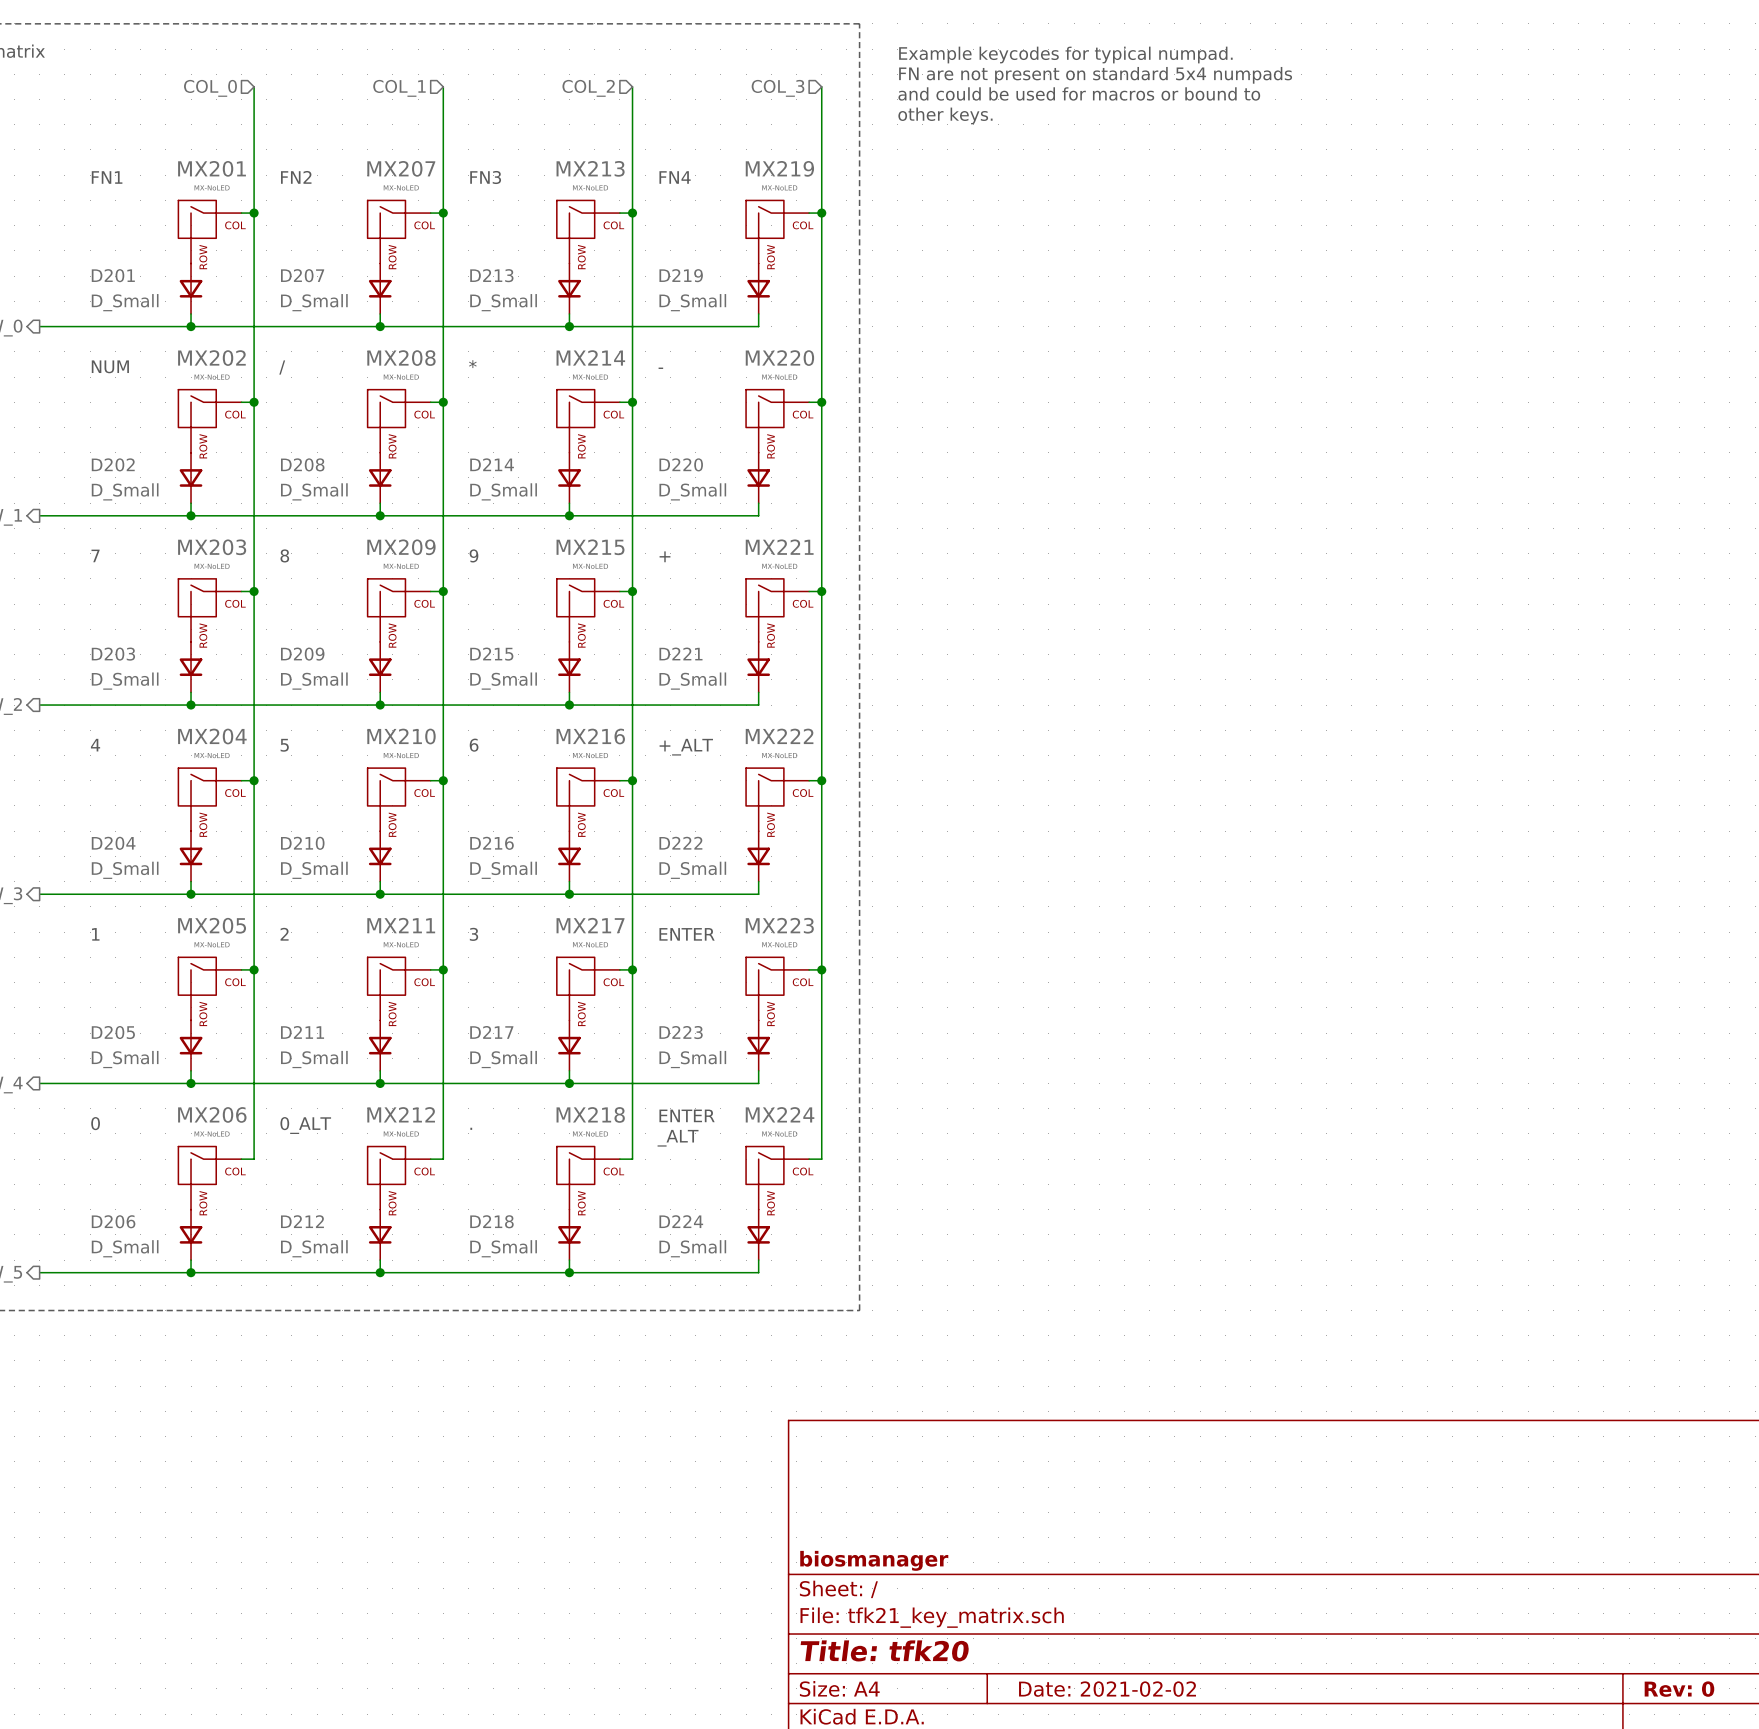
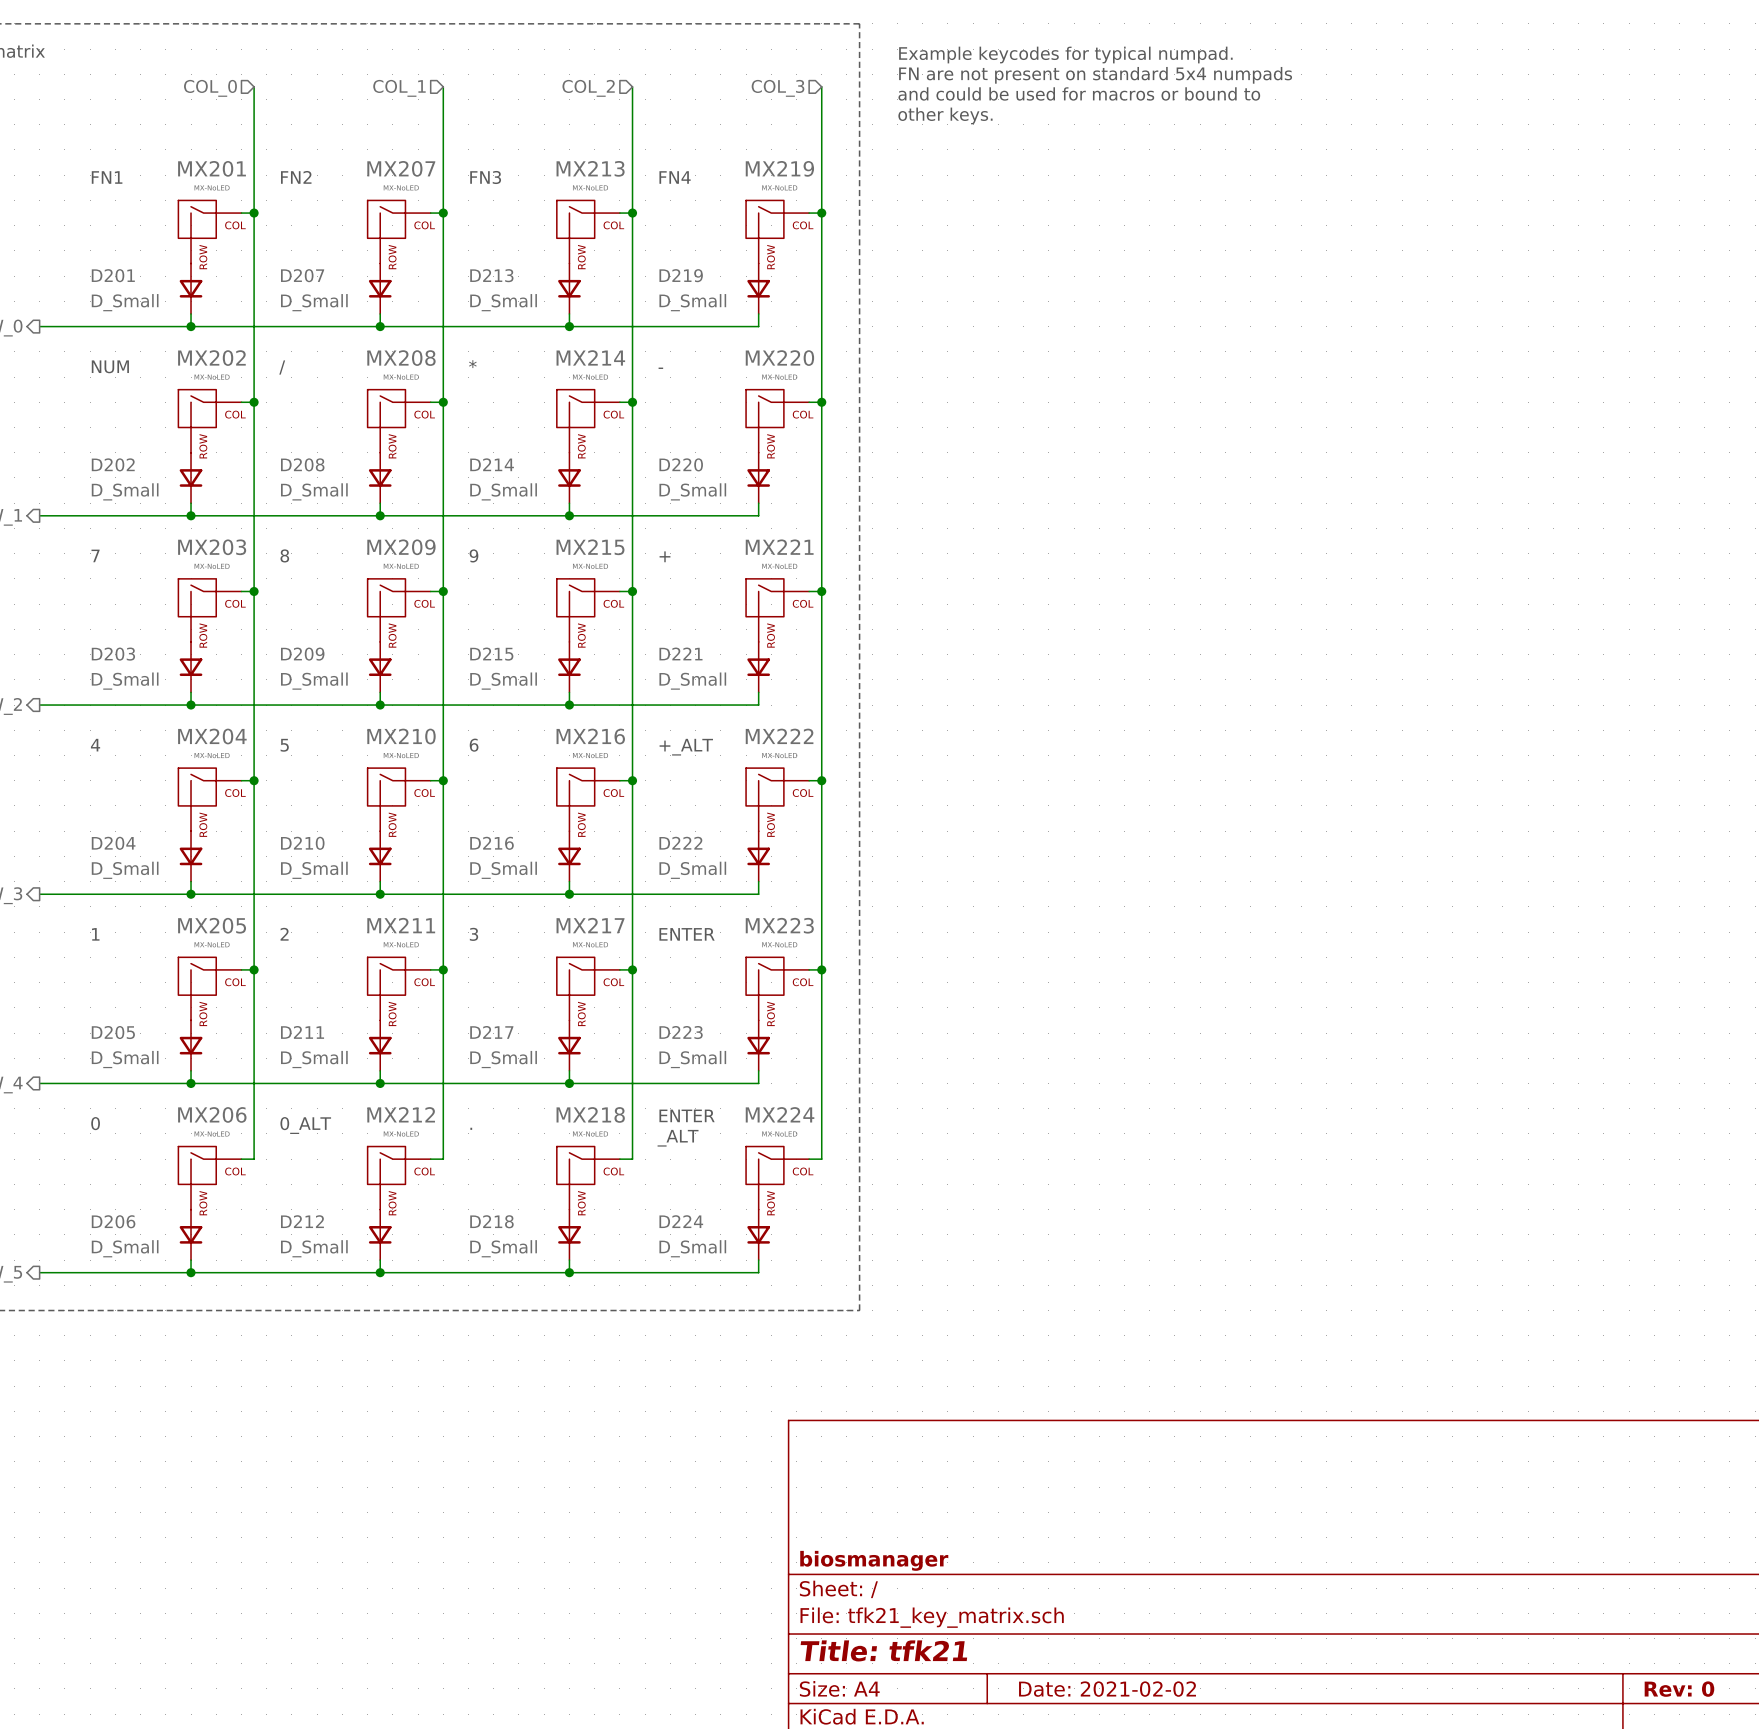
title block: Title: tfk20 (884, 1650) -> Title: tfk21 (883, 1650)

